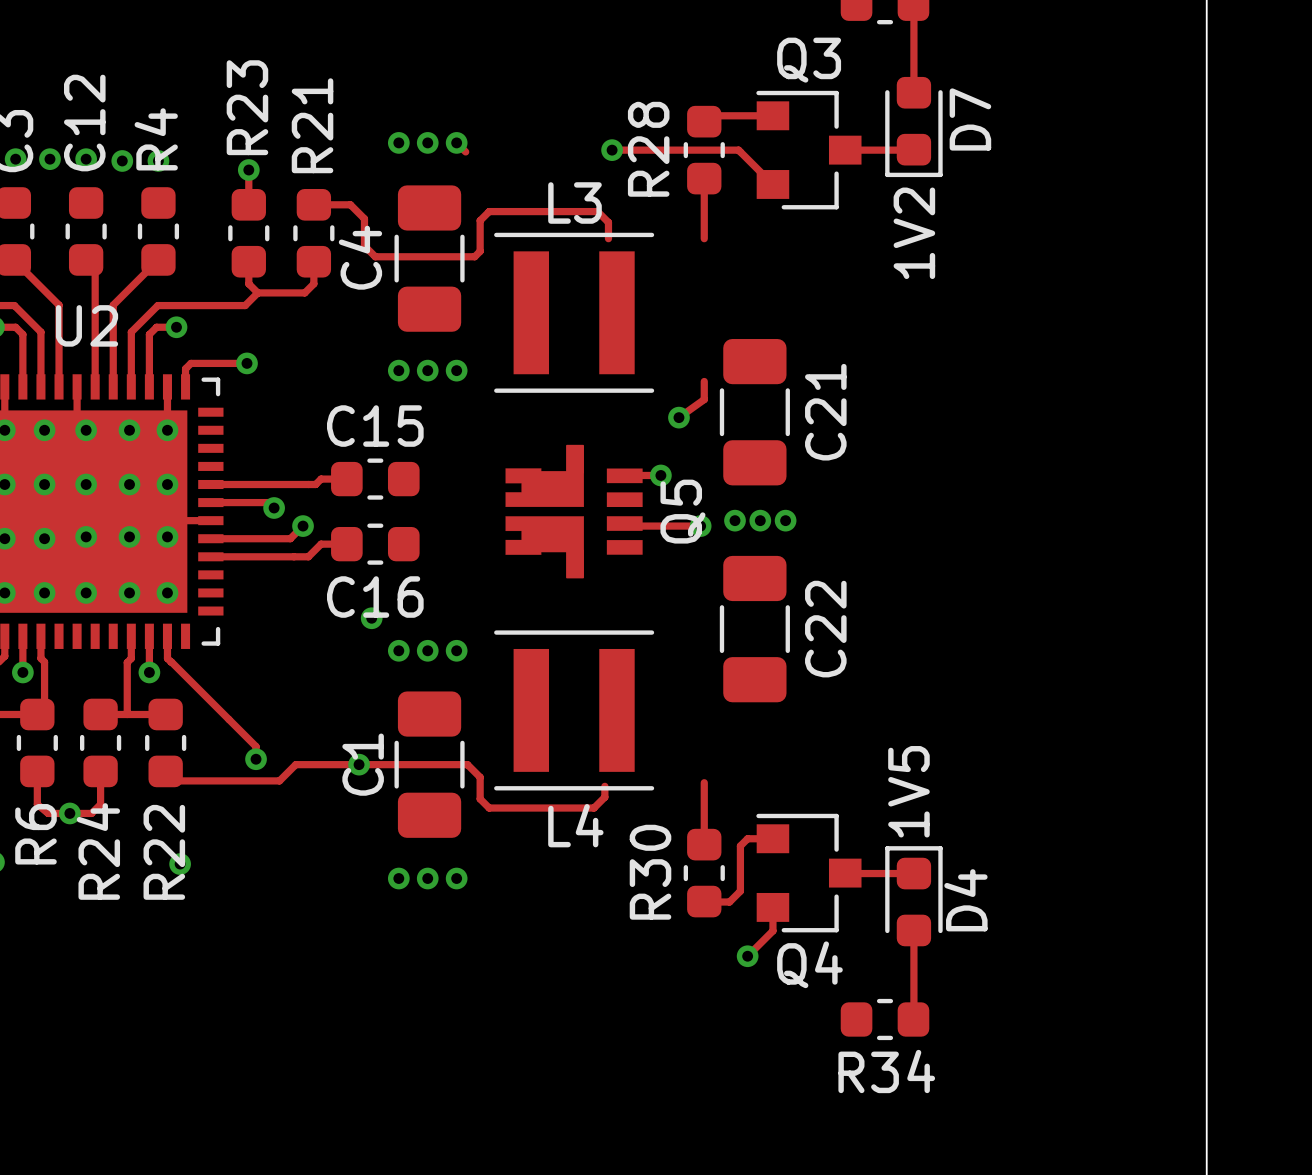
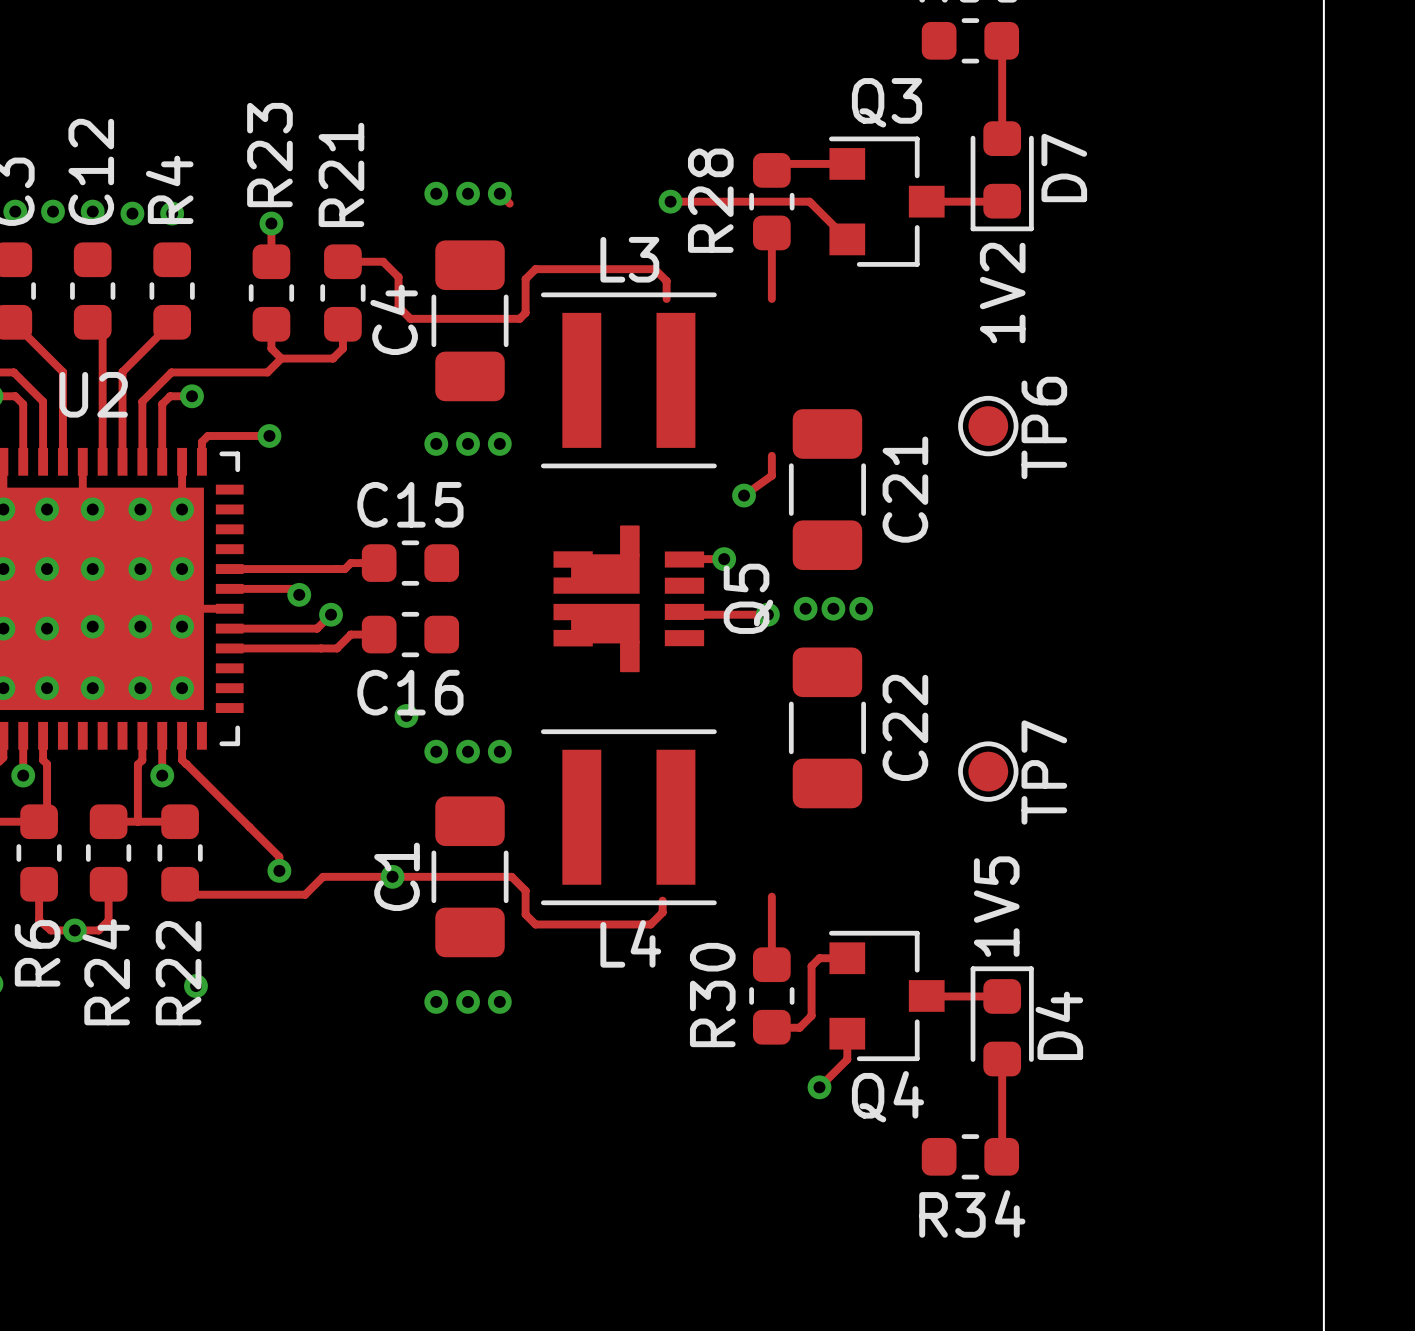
TP6: none -> (988, 426)
TP7: none -> (988, 771)

